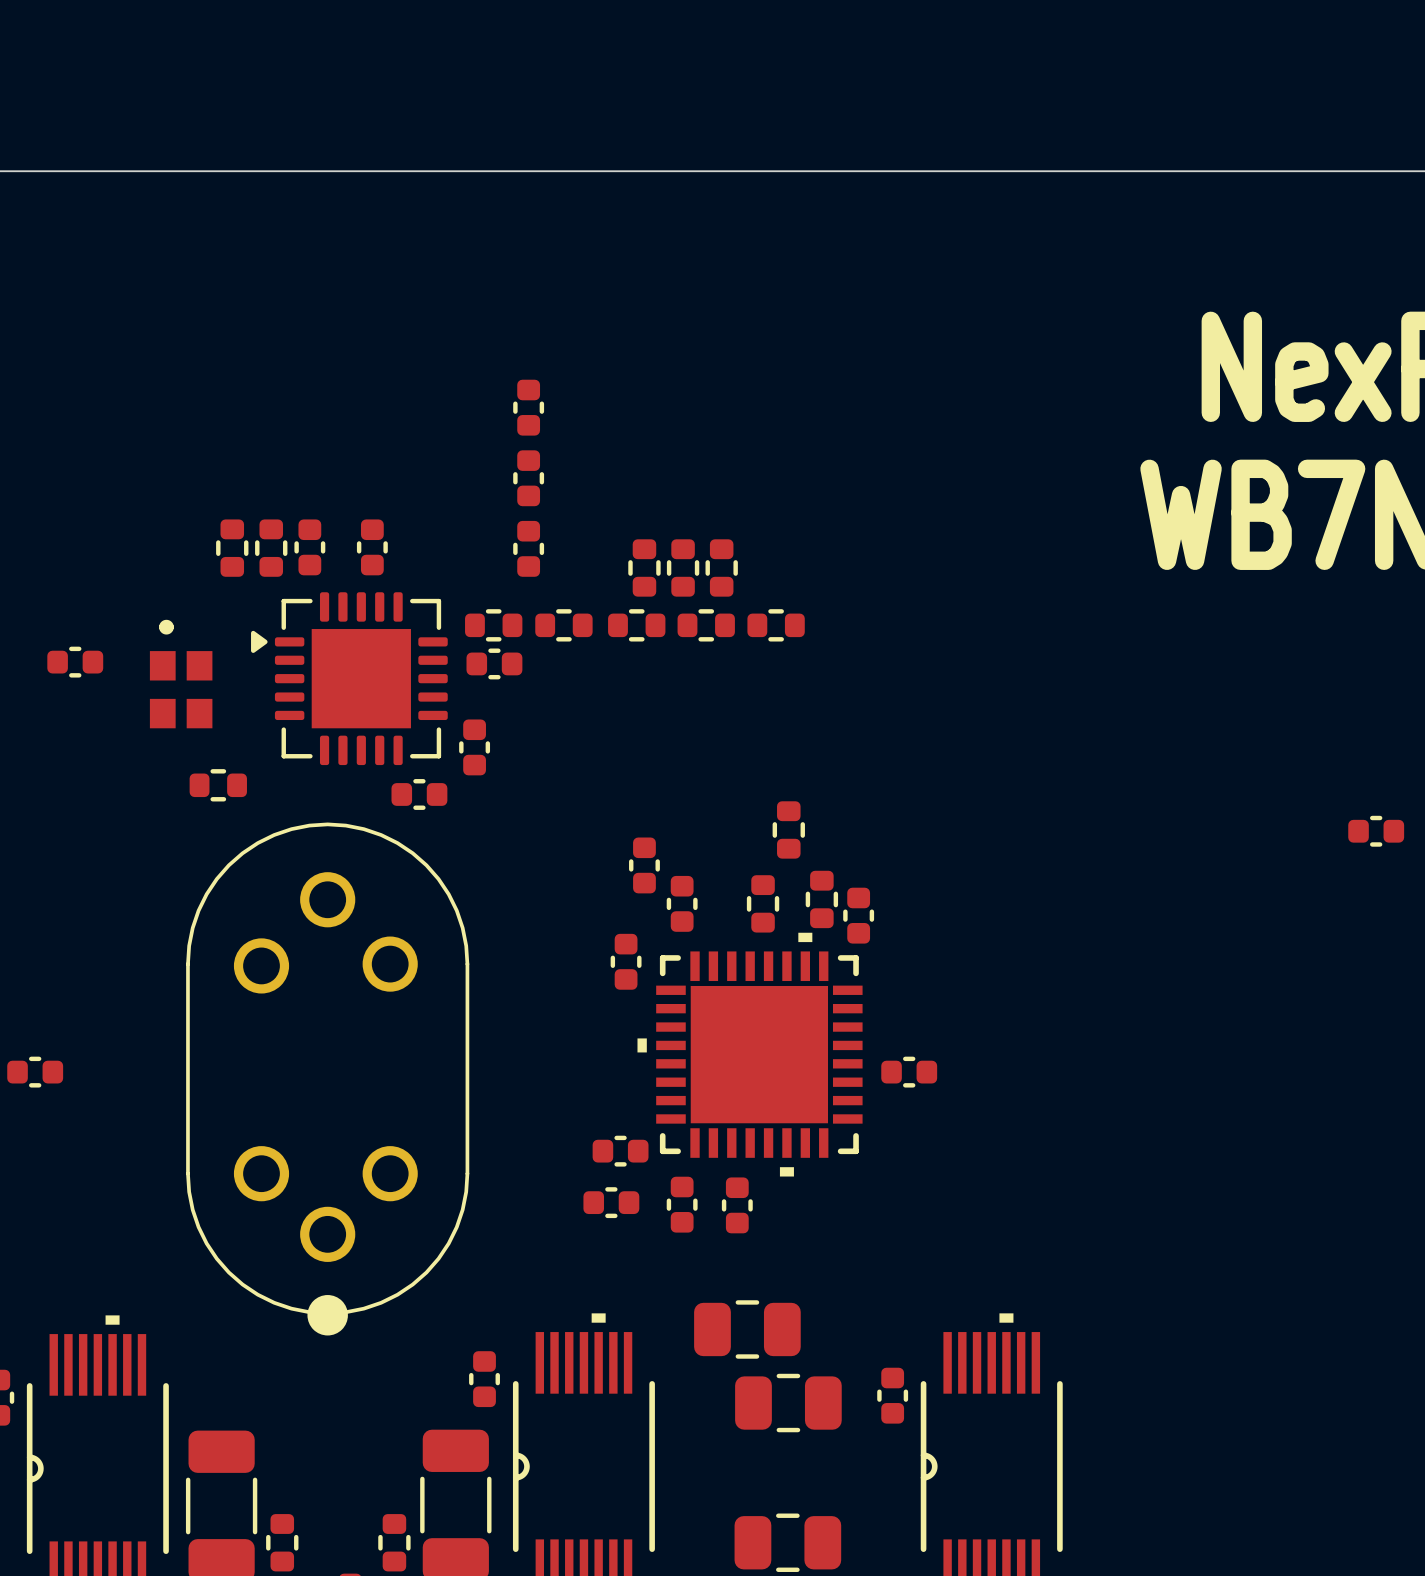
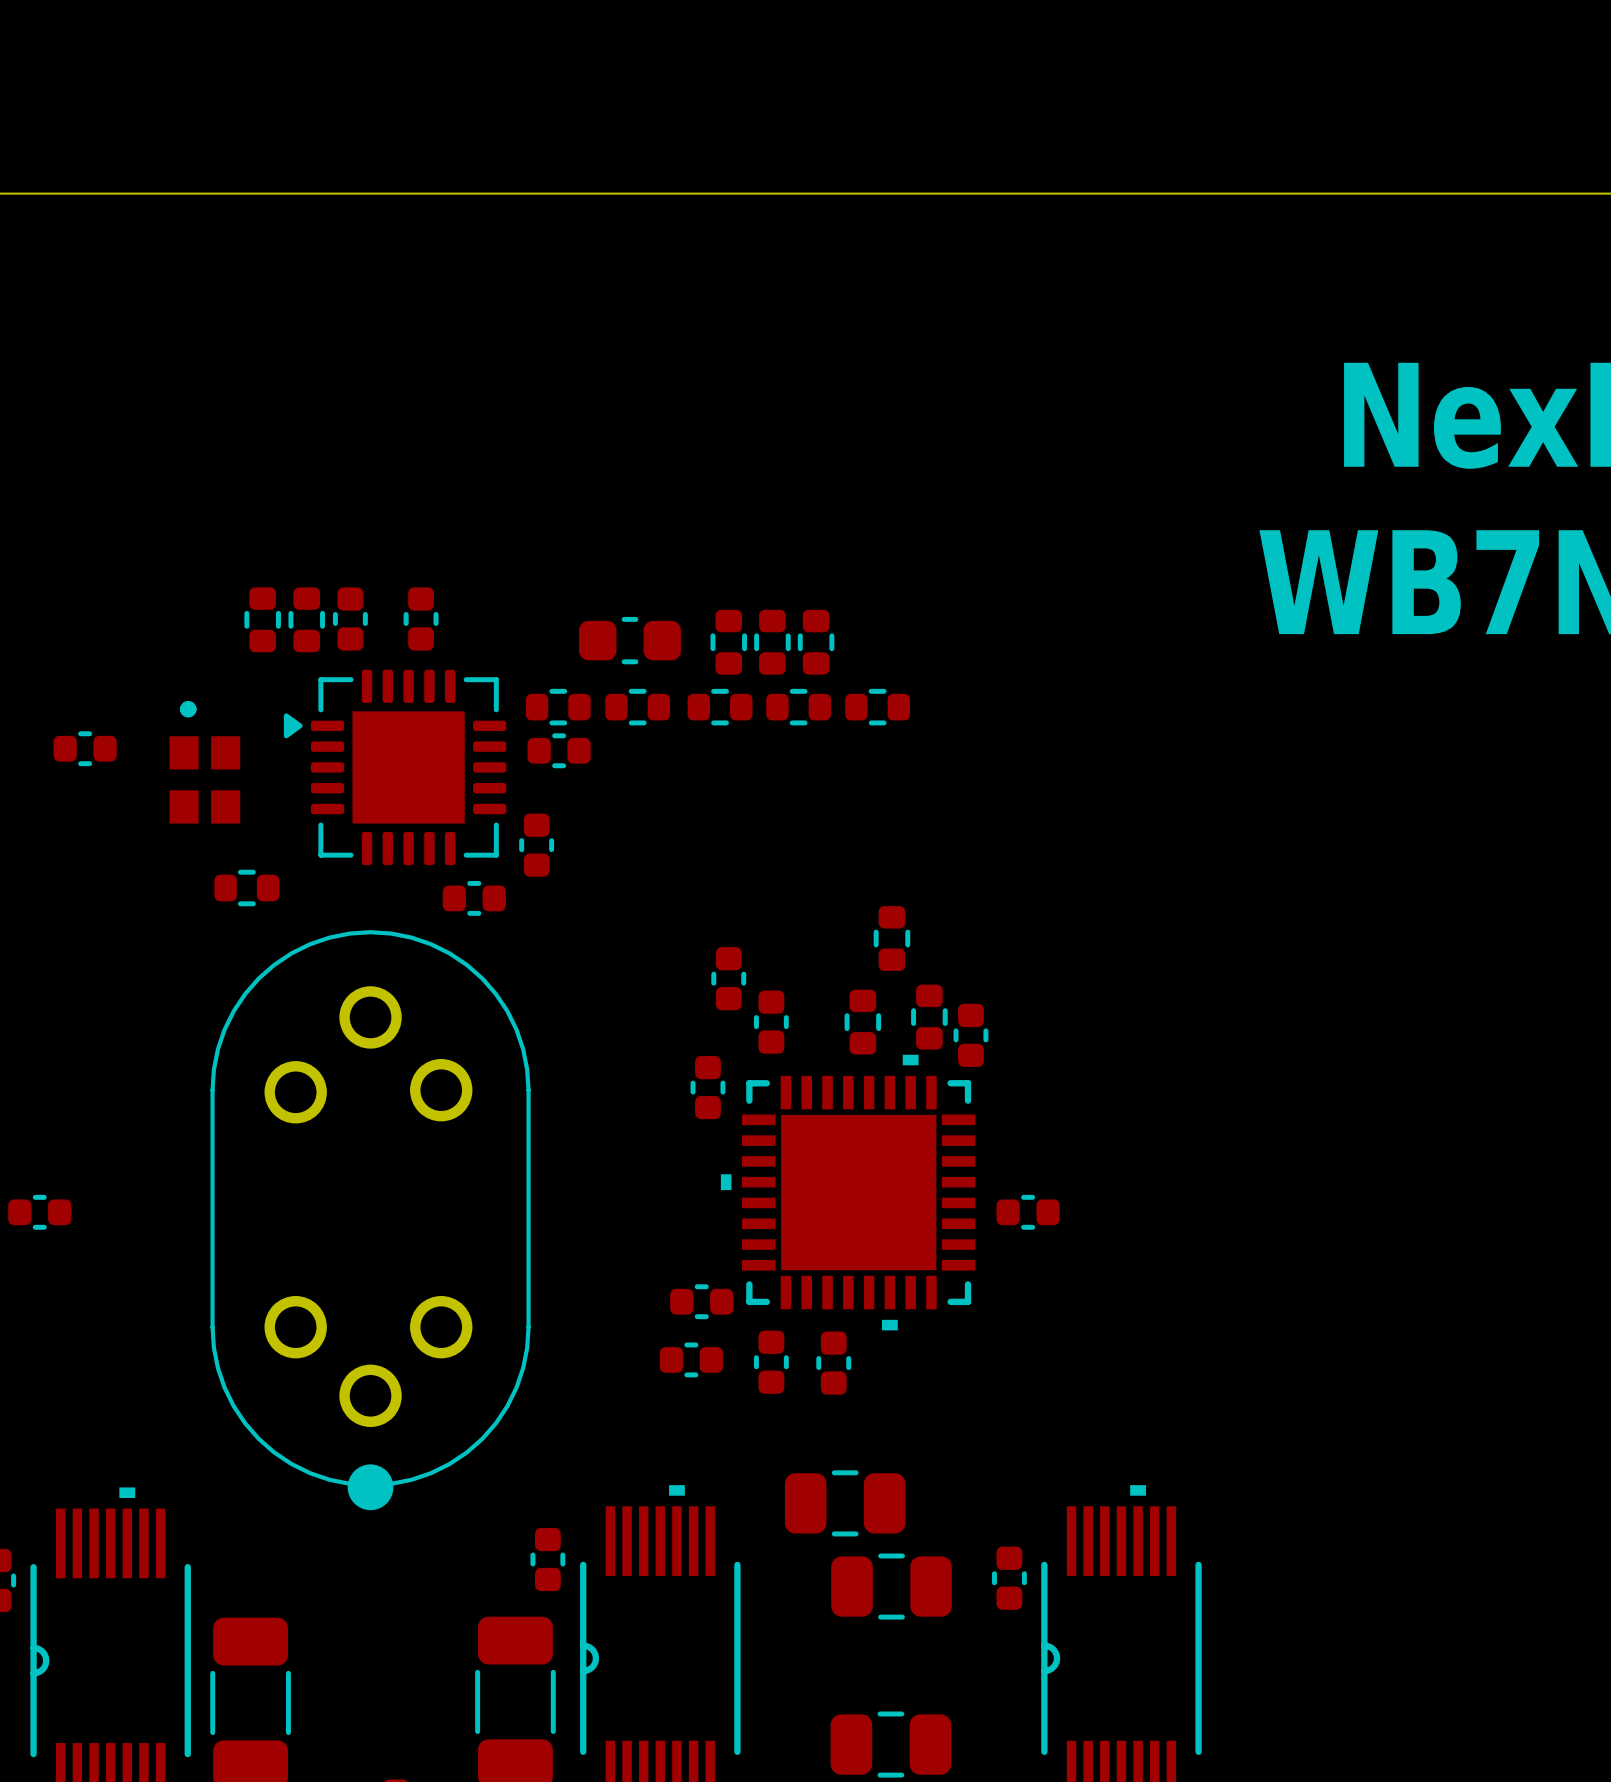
part: (528, 407) -> none
part: (528, 478) -> none
part footprint: [513, 520, 545, 577] -> [579, 616, 681, 665]
part: (1376, 831) -> none
part: (282, 1542) -> none
part: (394, 1542) -> none

